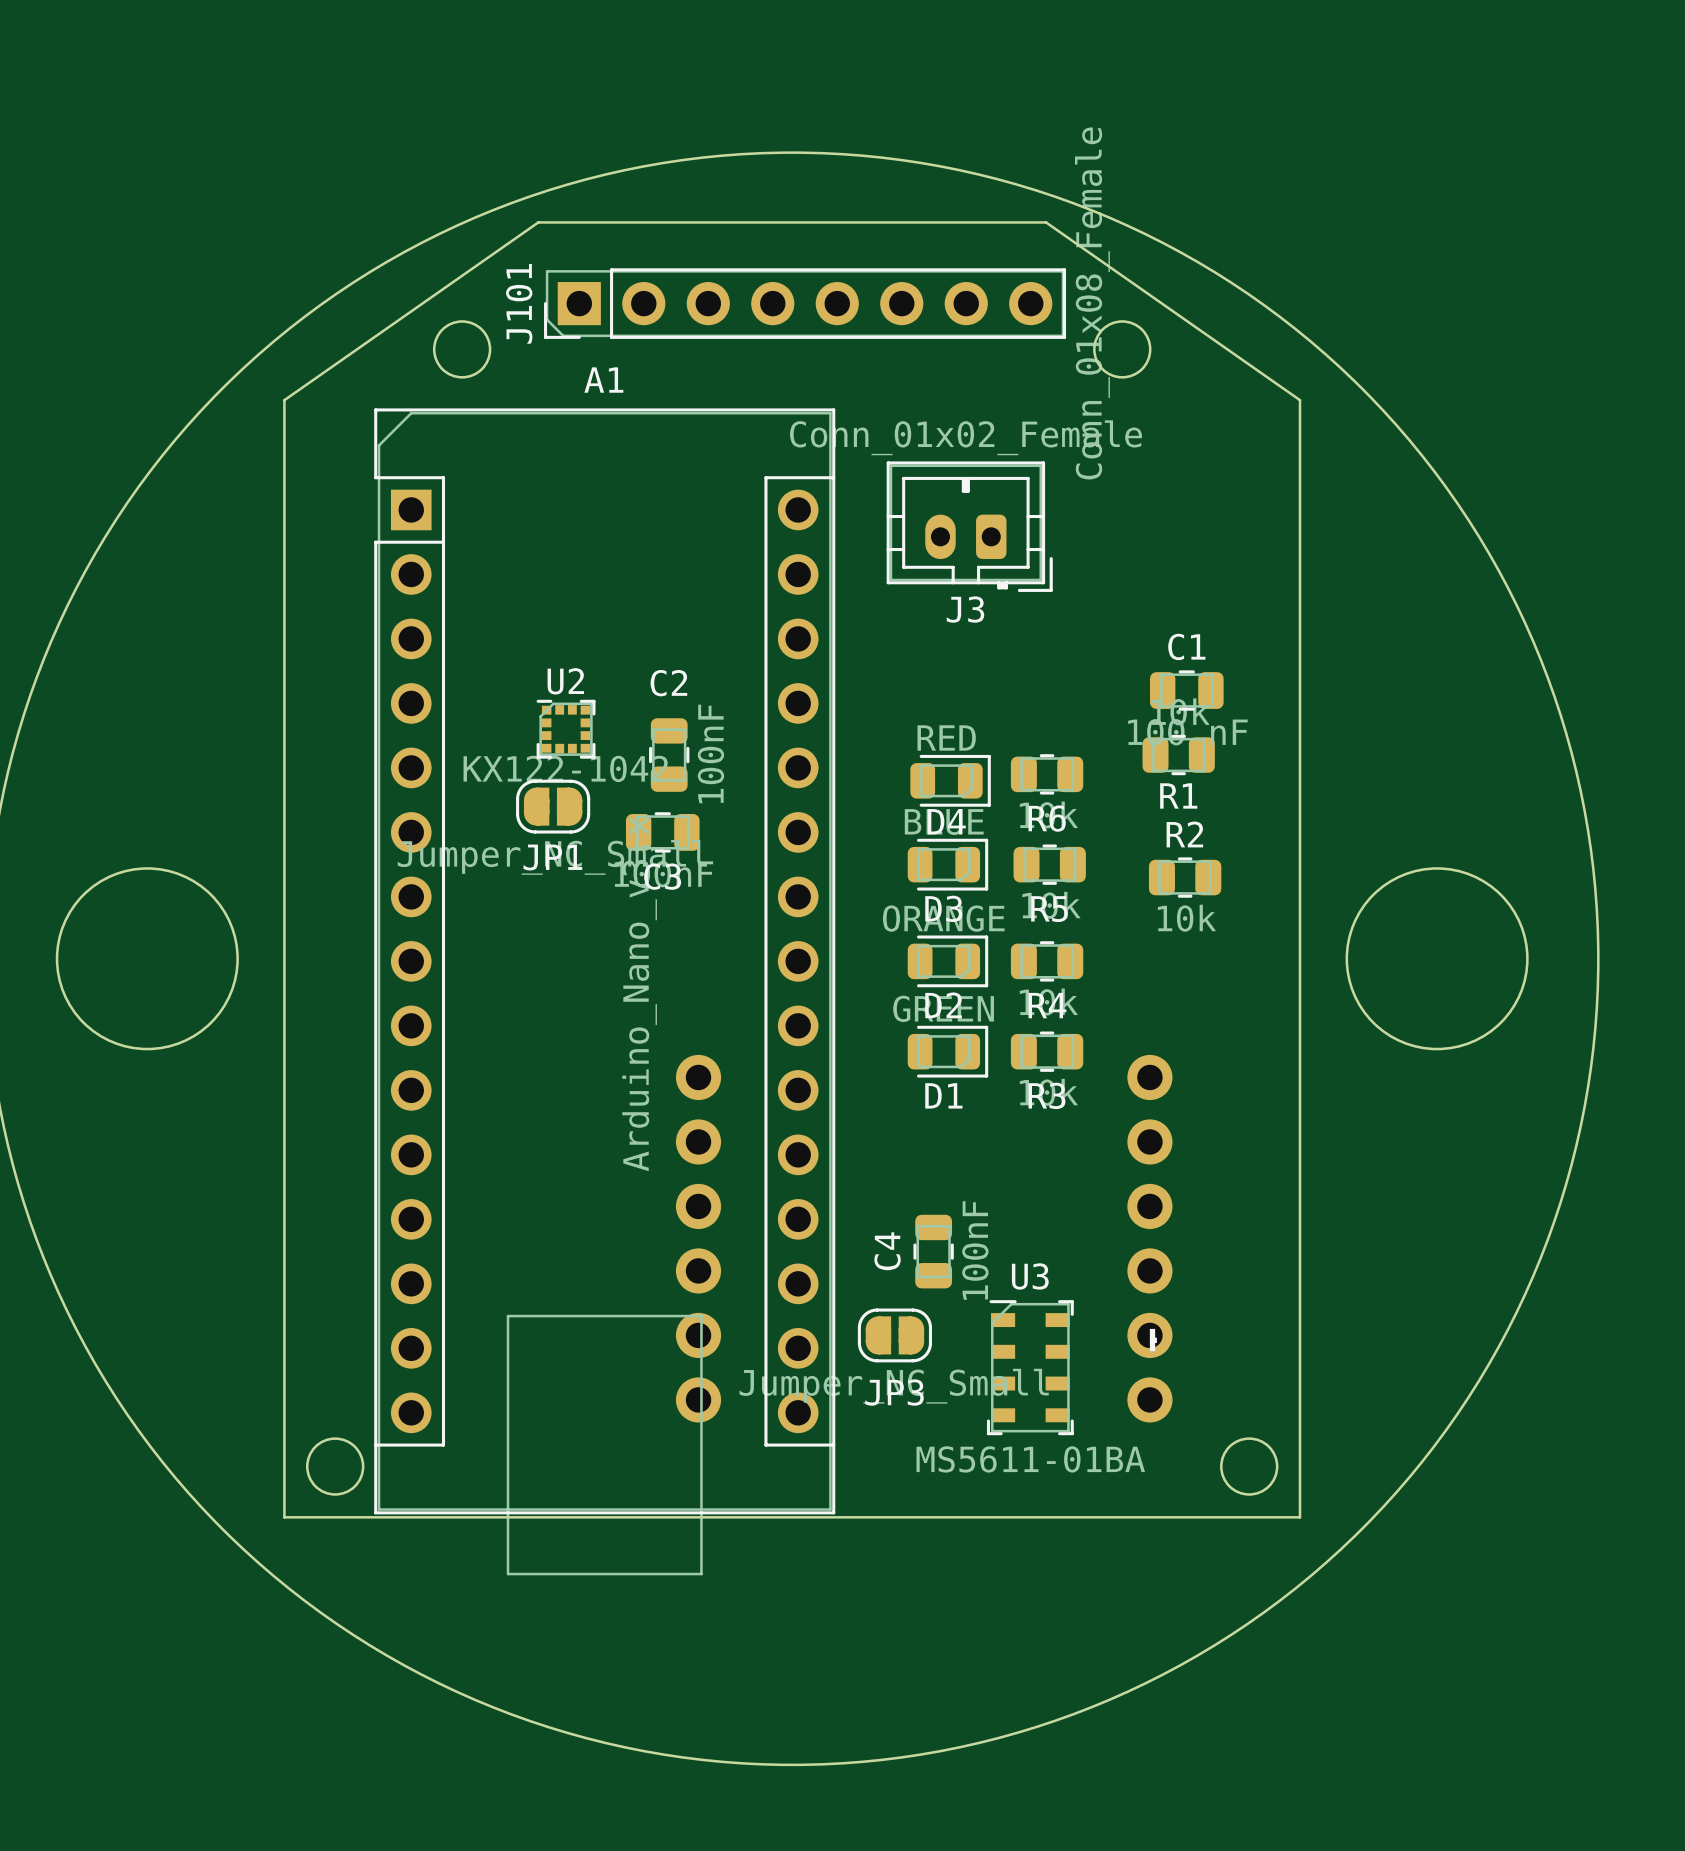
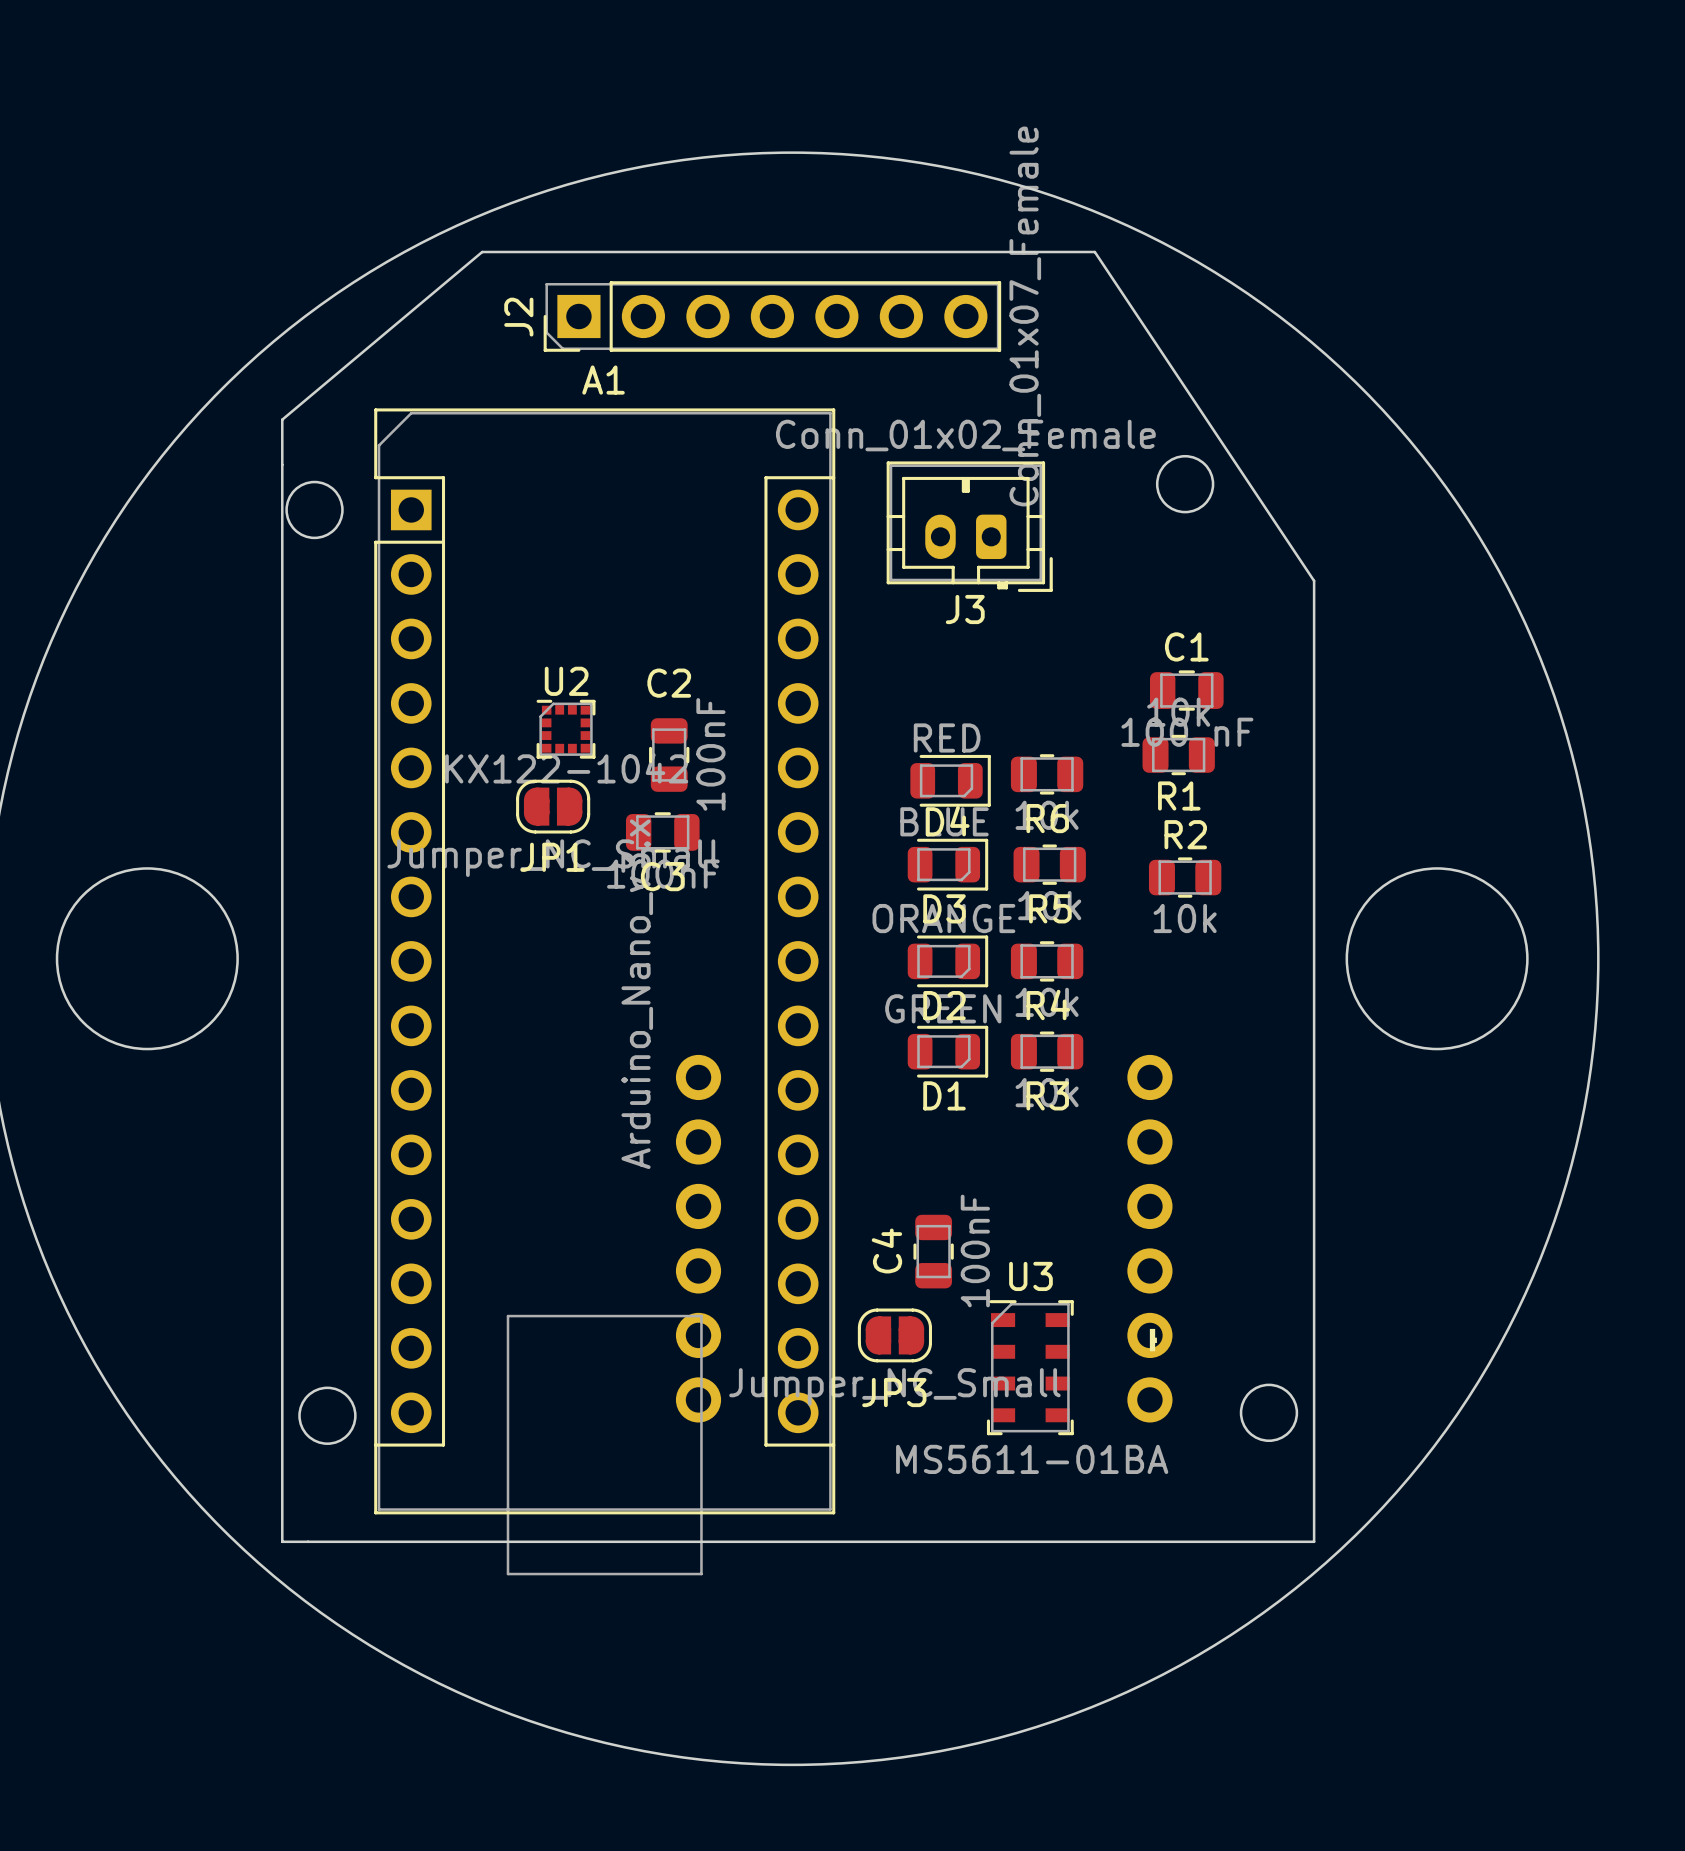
board edge: (538, 222) (1046, 222) (1300, 400) (1300, 1517) (284, 1517) (284, 400) (538, 222) -> (482, 252) (282, 419) (282, 1541) (1314, 1541) (1314, 580) (1094, 252) (482, 252)
J101: Conn_01x08_Female (805, 303) -> none
J2: none -> Conn_01x07_Female (772, 316)
round board edge position: (462, 349) -> (314, 509)
round board edge position: (1122, 349) -> (1185, 484)
round board edge position: (335, 1466) -> (327, 1415)
round board edge position: (1249, 1466) -> (1268, 1412)

